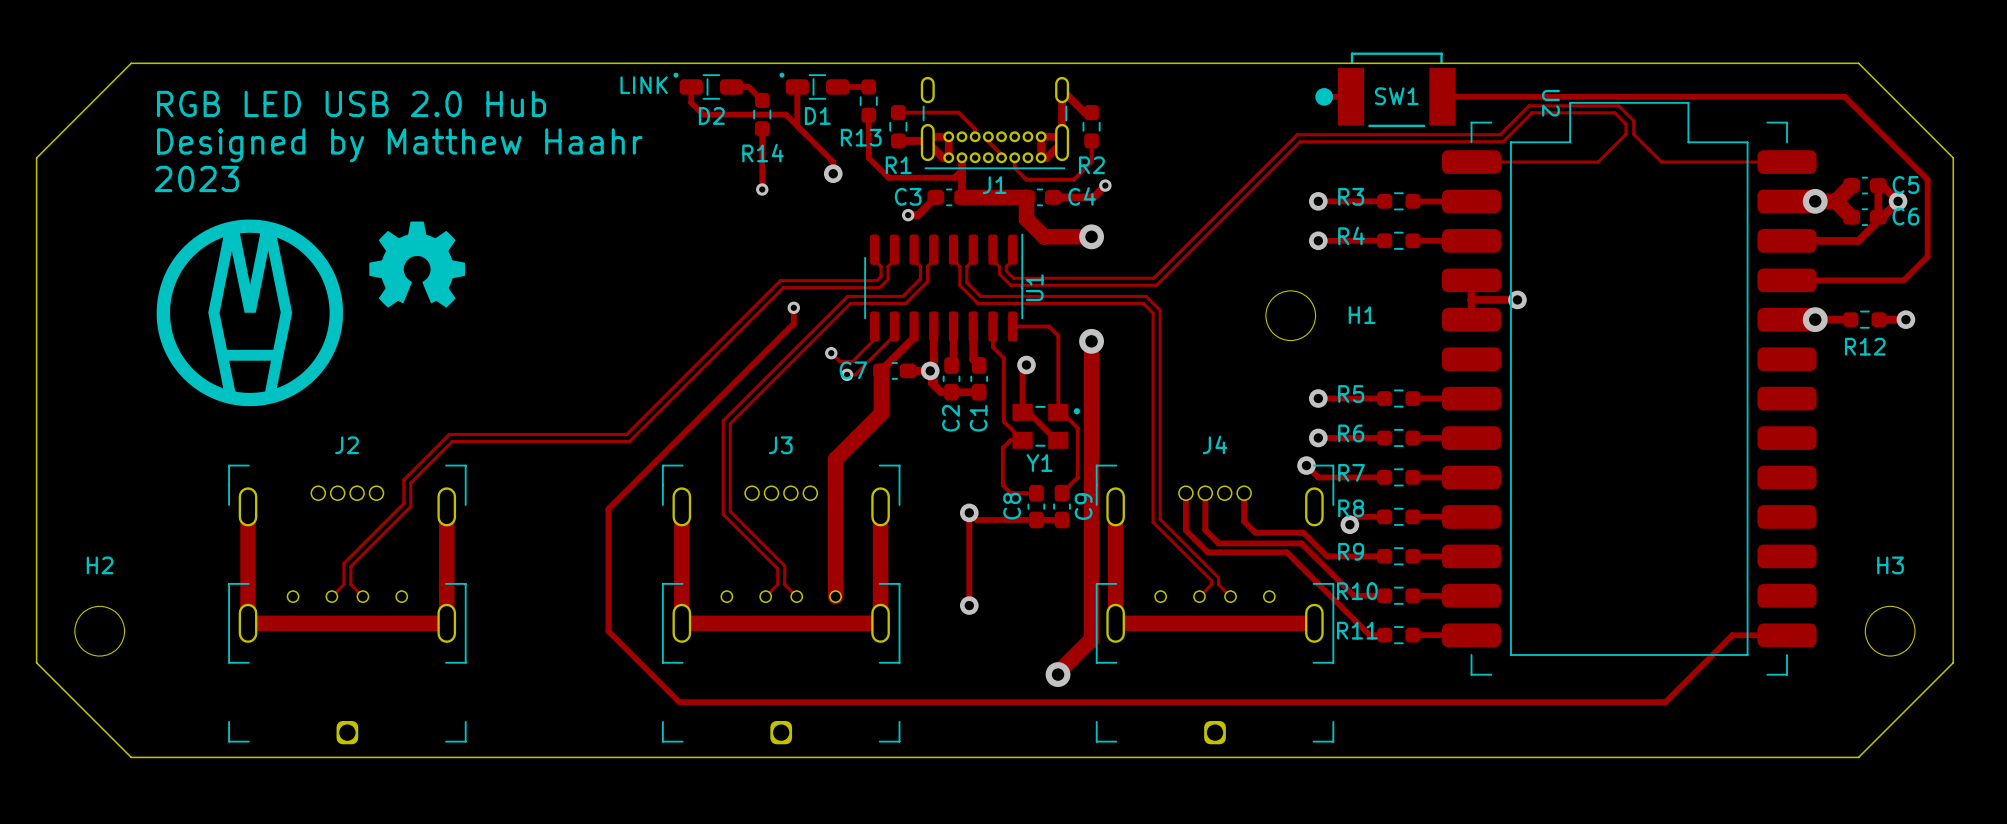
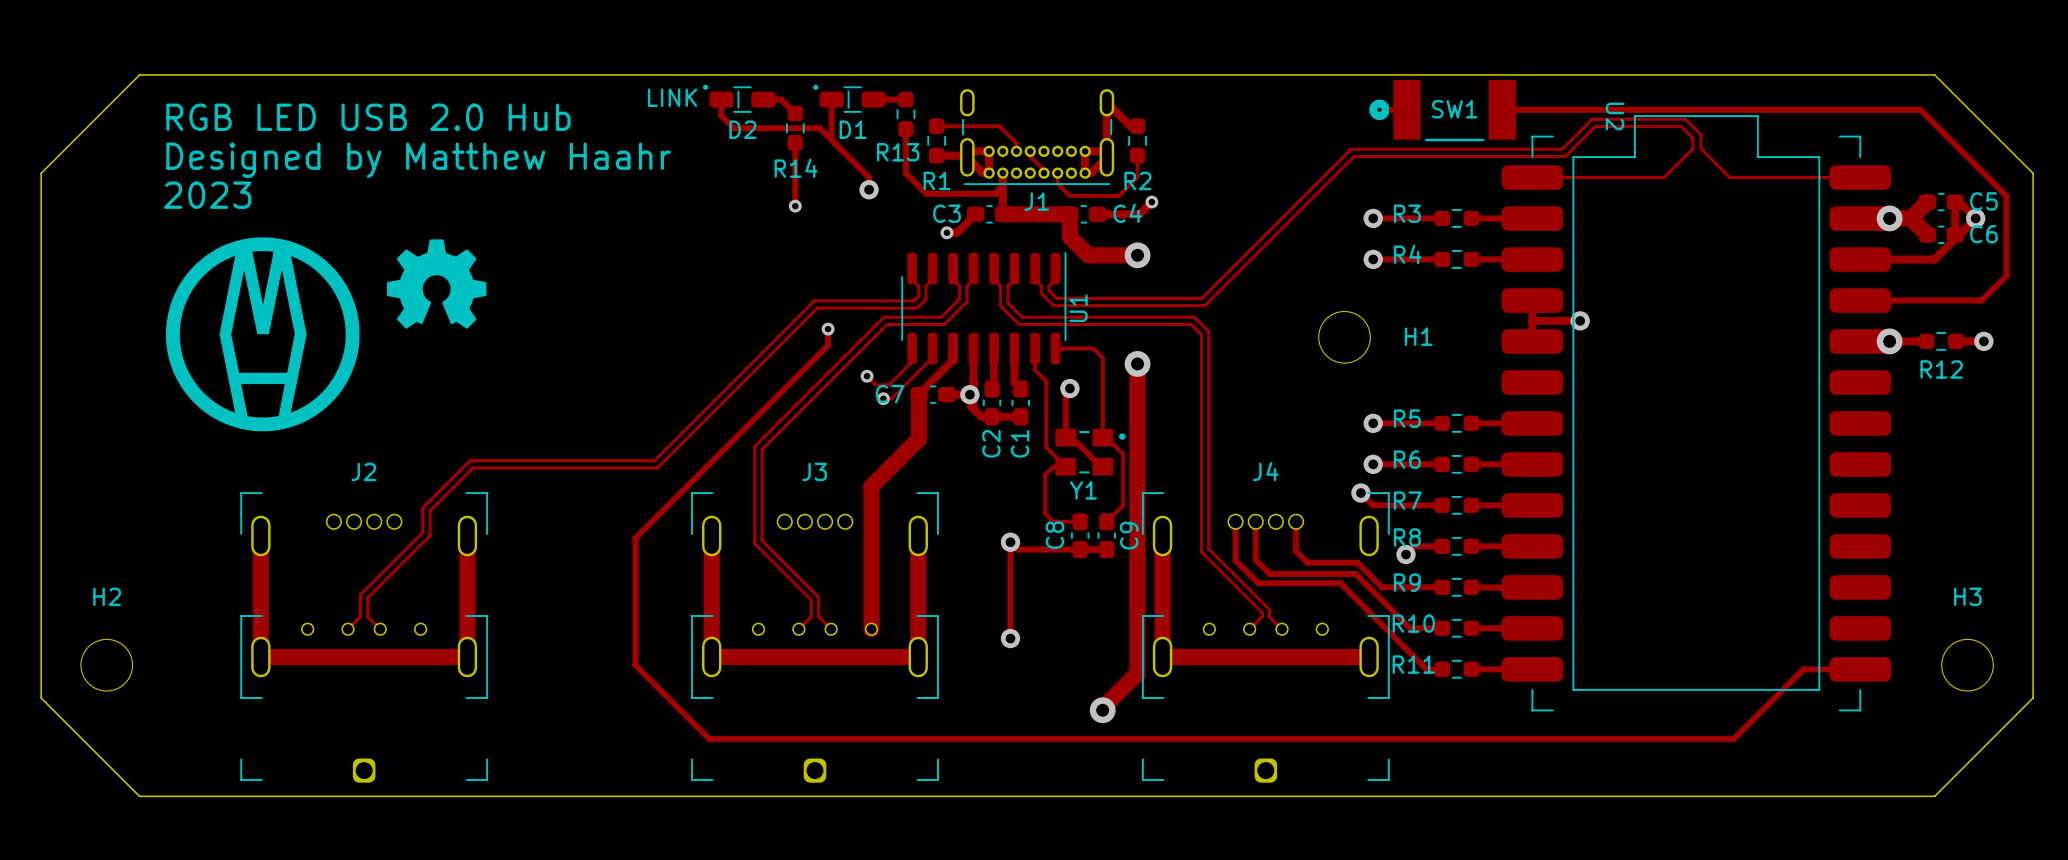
SW1 footprint: [1315, 52, 1456, 128] -> [1369, 79, 1517, 142]

